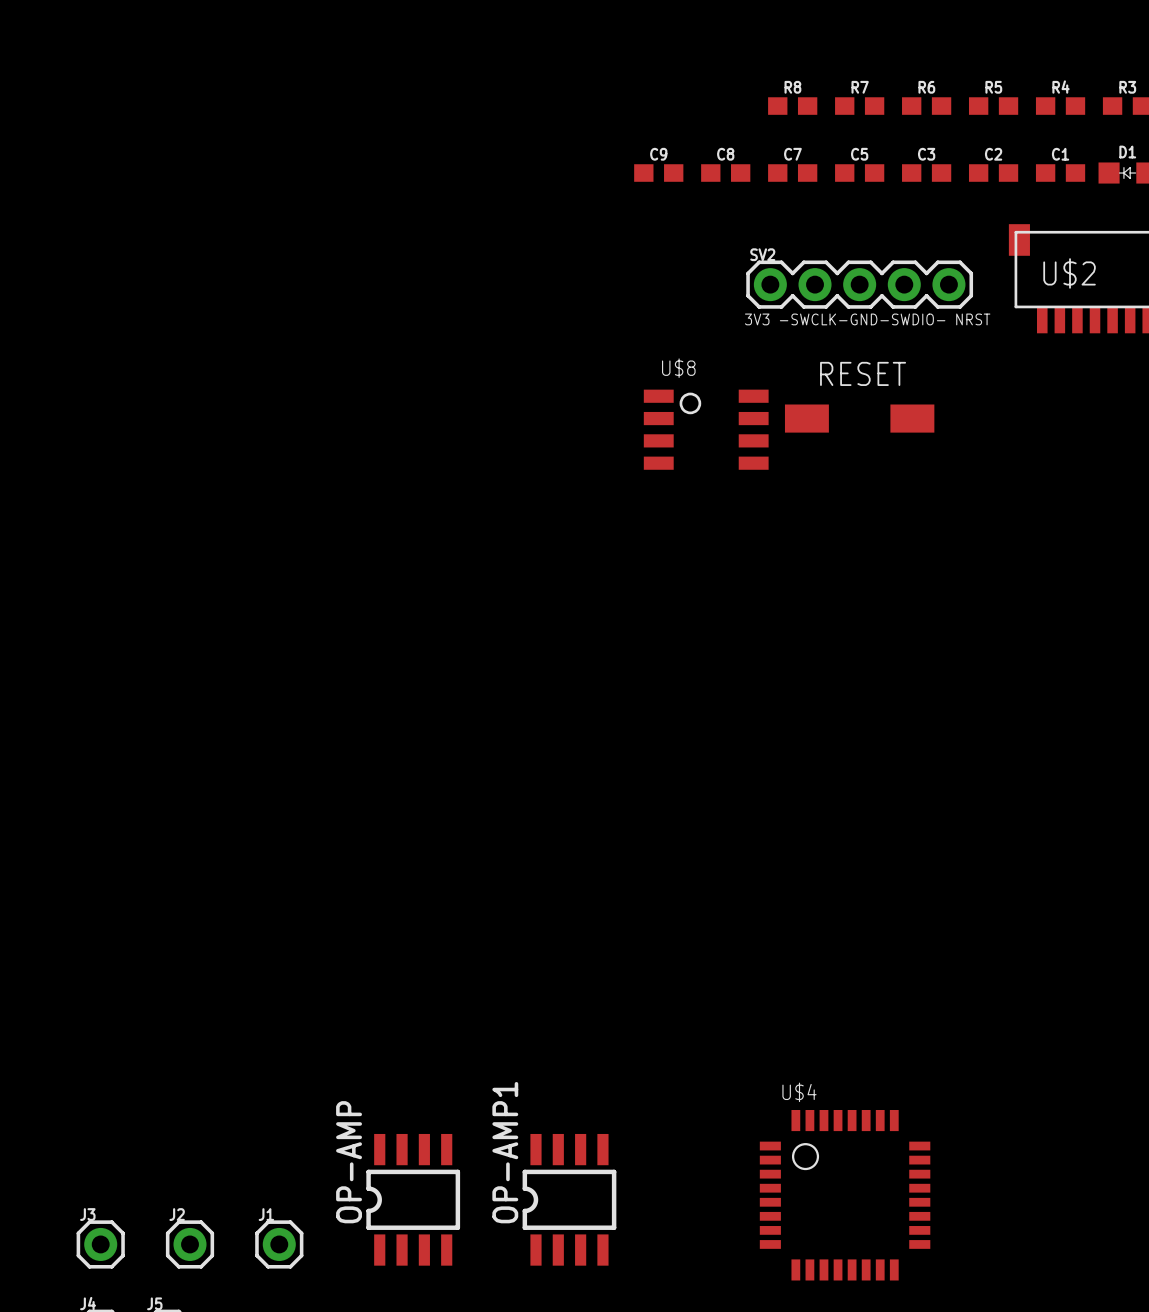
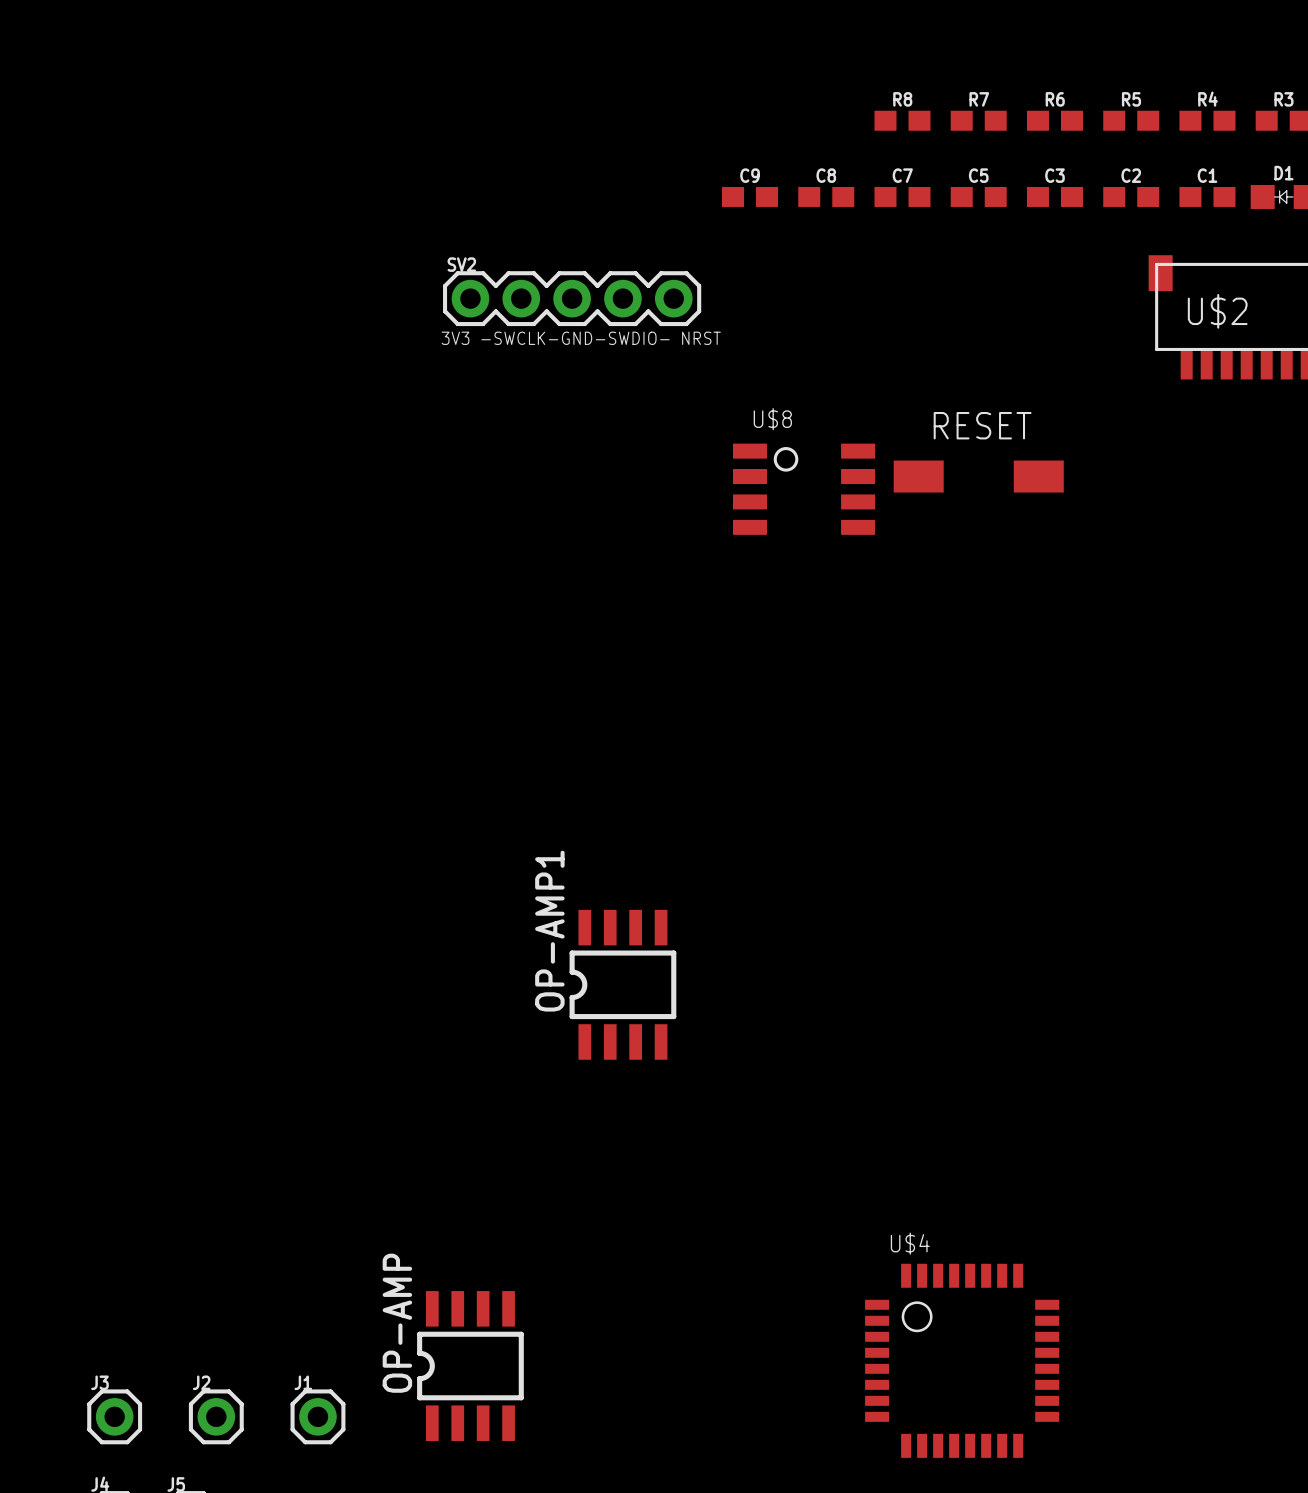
SV2 position: (859, 284) -> (572, 298)
OP-AMP1 position: (569, 1199) -> (622, 984)

